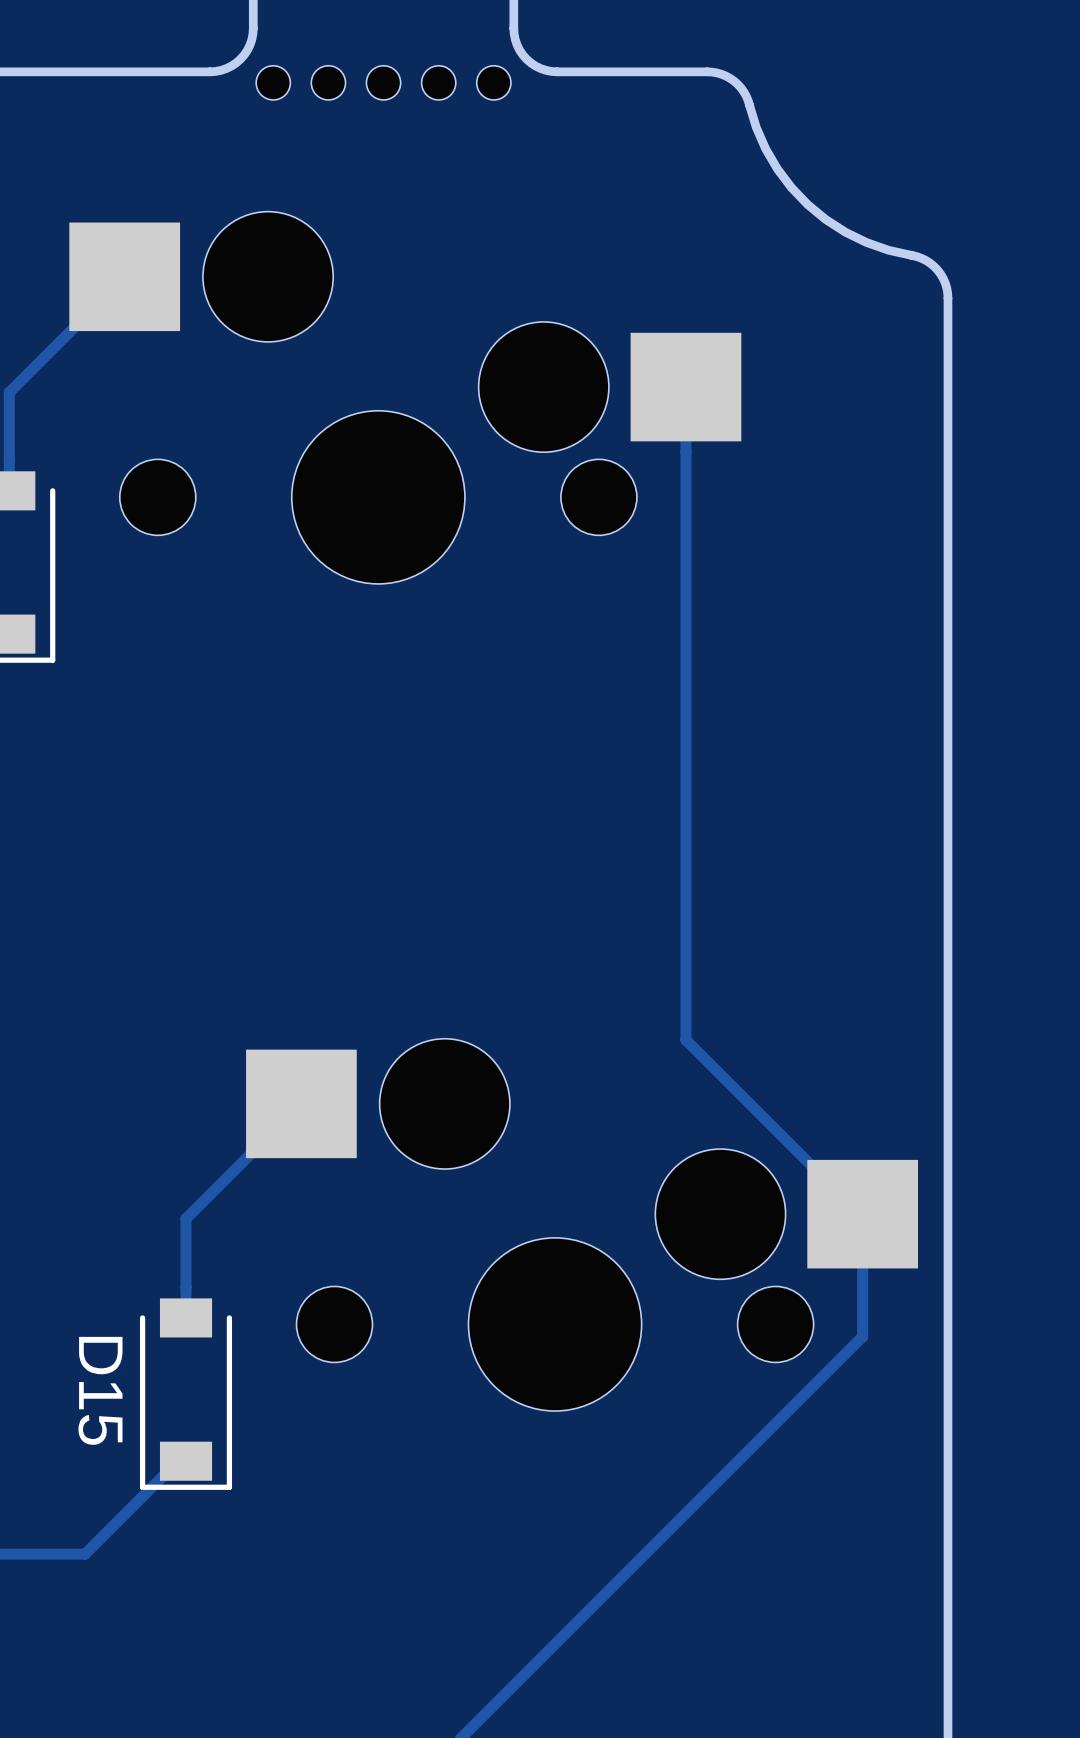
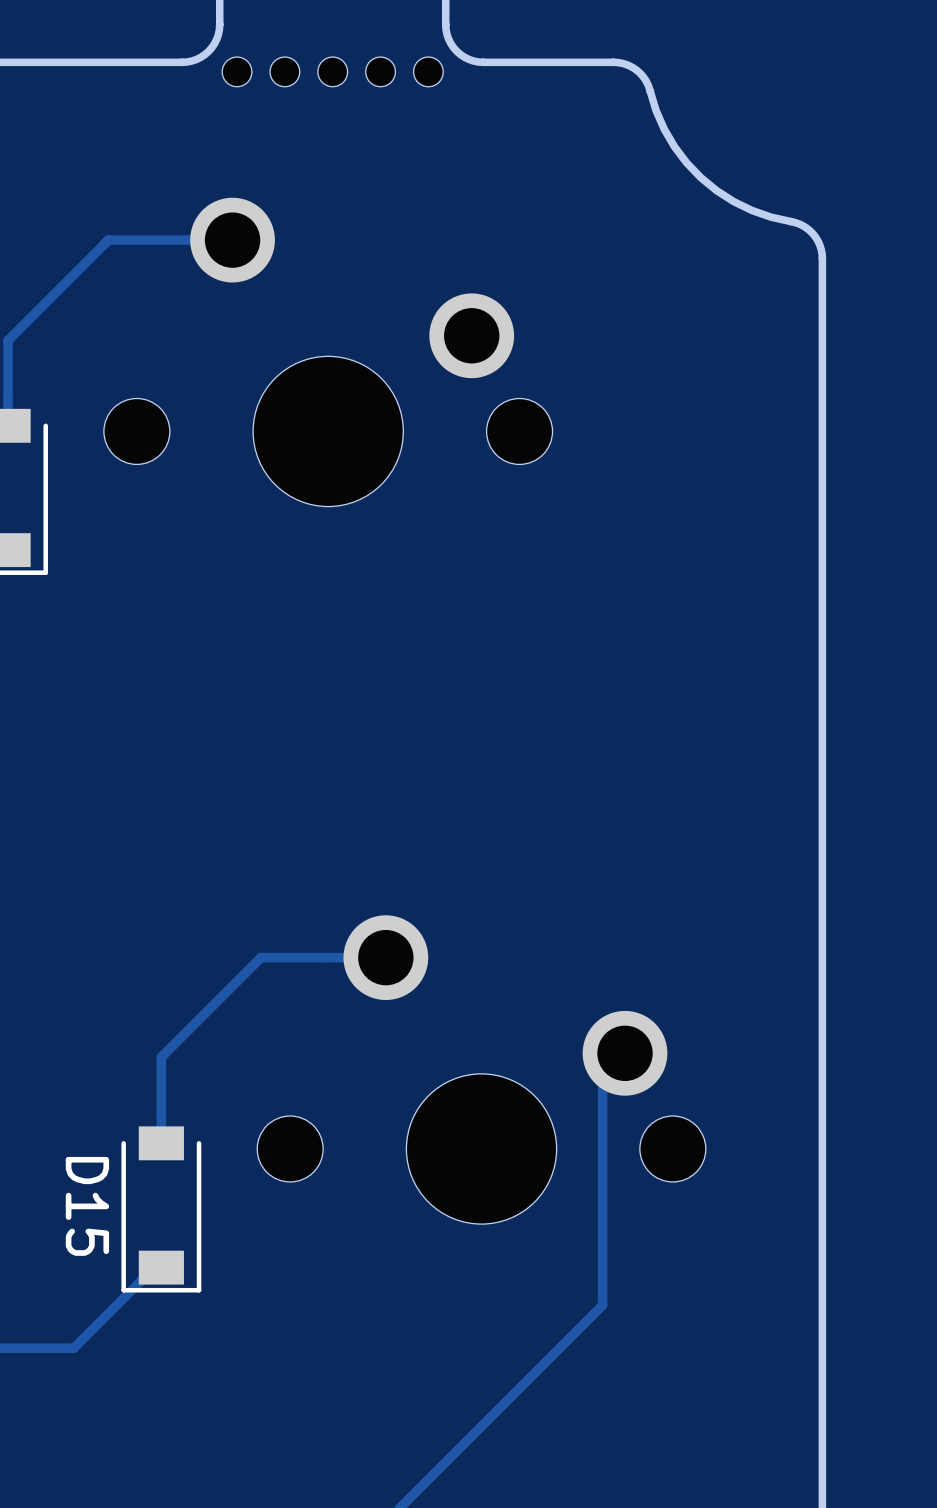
part footprint: [69, 211, 742, 584] -> [103, 197, 553, 507]
track: none -> (232, 240) (108, 240)
track: (685, 387) (685, 1040) (860, 1214) (862, 1214) (862, 1336) (694, 1504) -> (625, 1053) (602, 1075) (602, 1305)
part footprint: [246, 1038, 919, 1412] -> [257, 915, 706, 1225]
track: none -> (385, 957) (261, 957)

